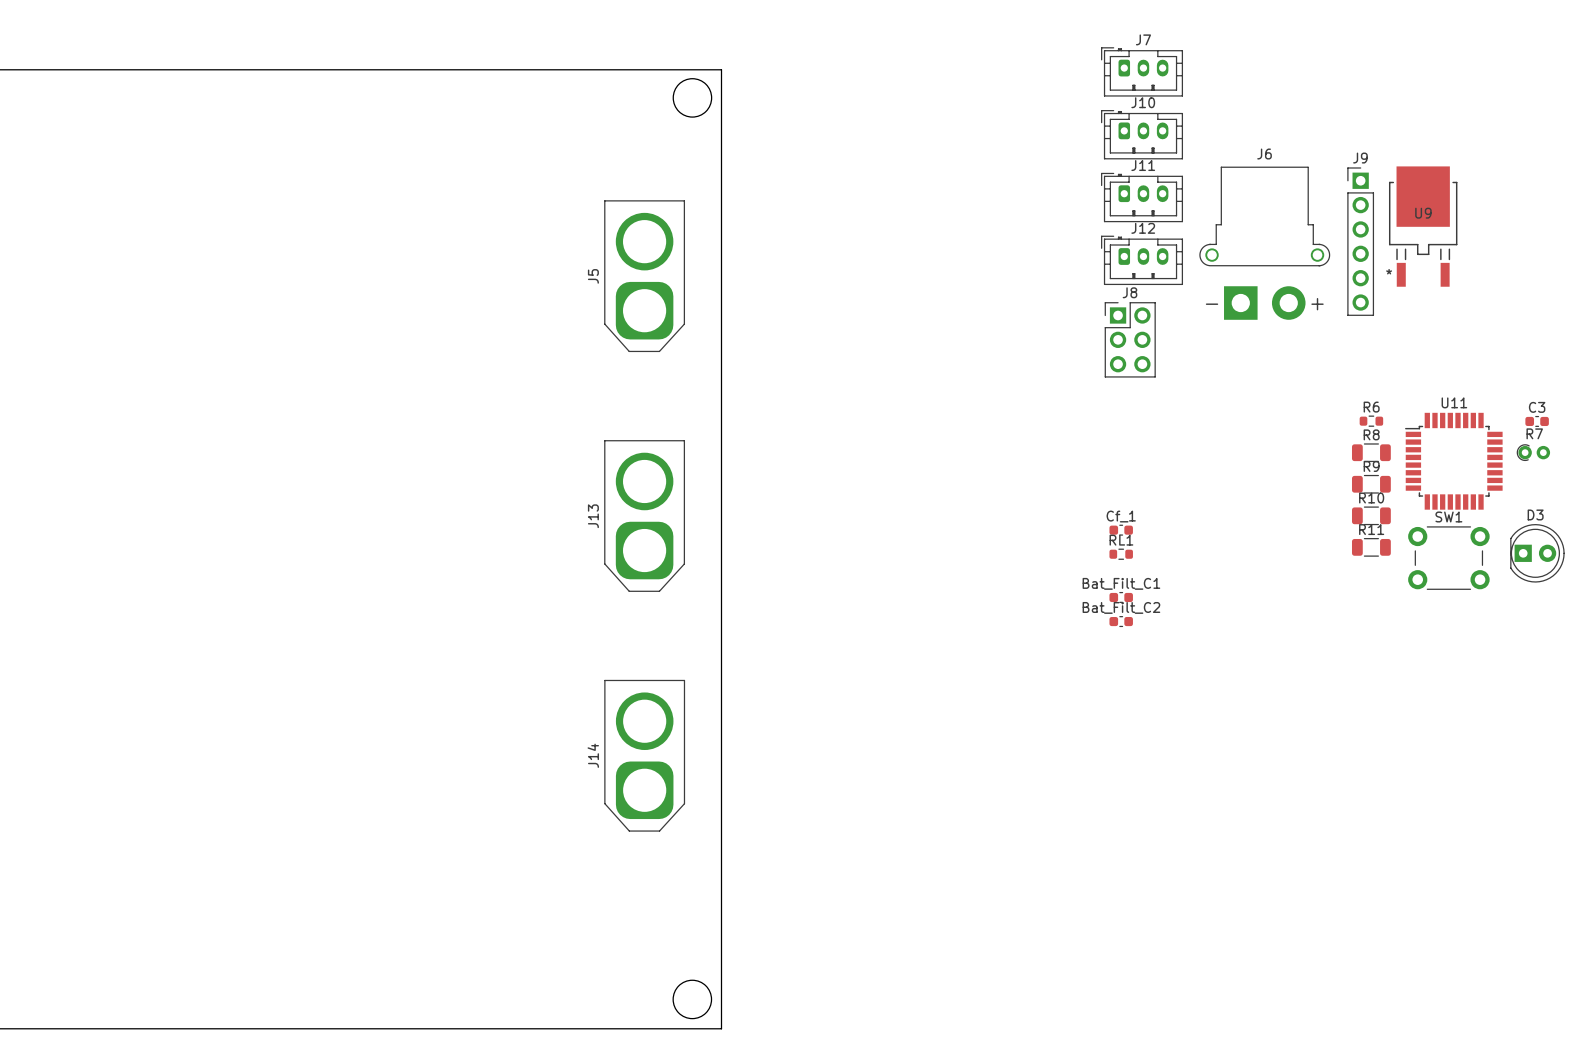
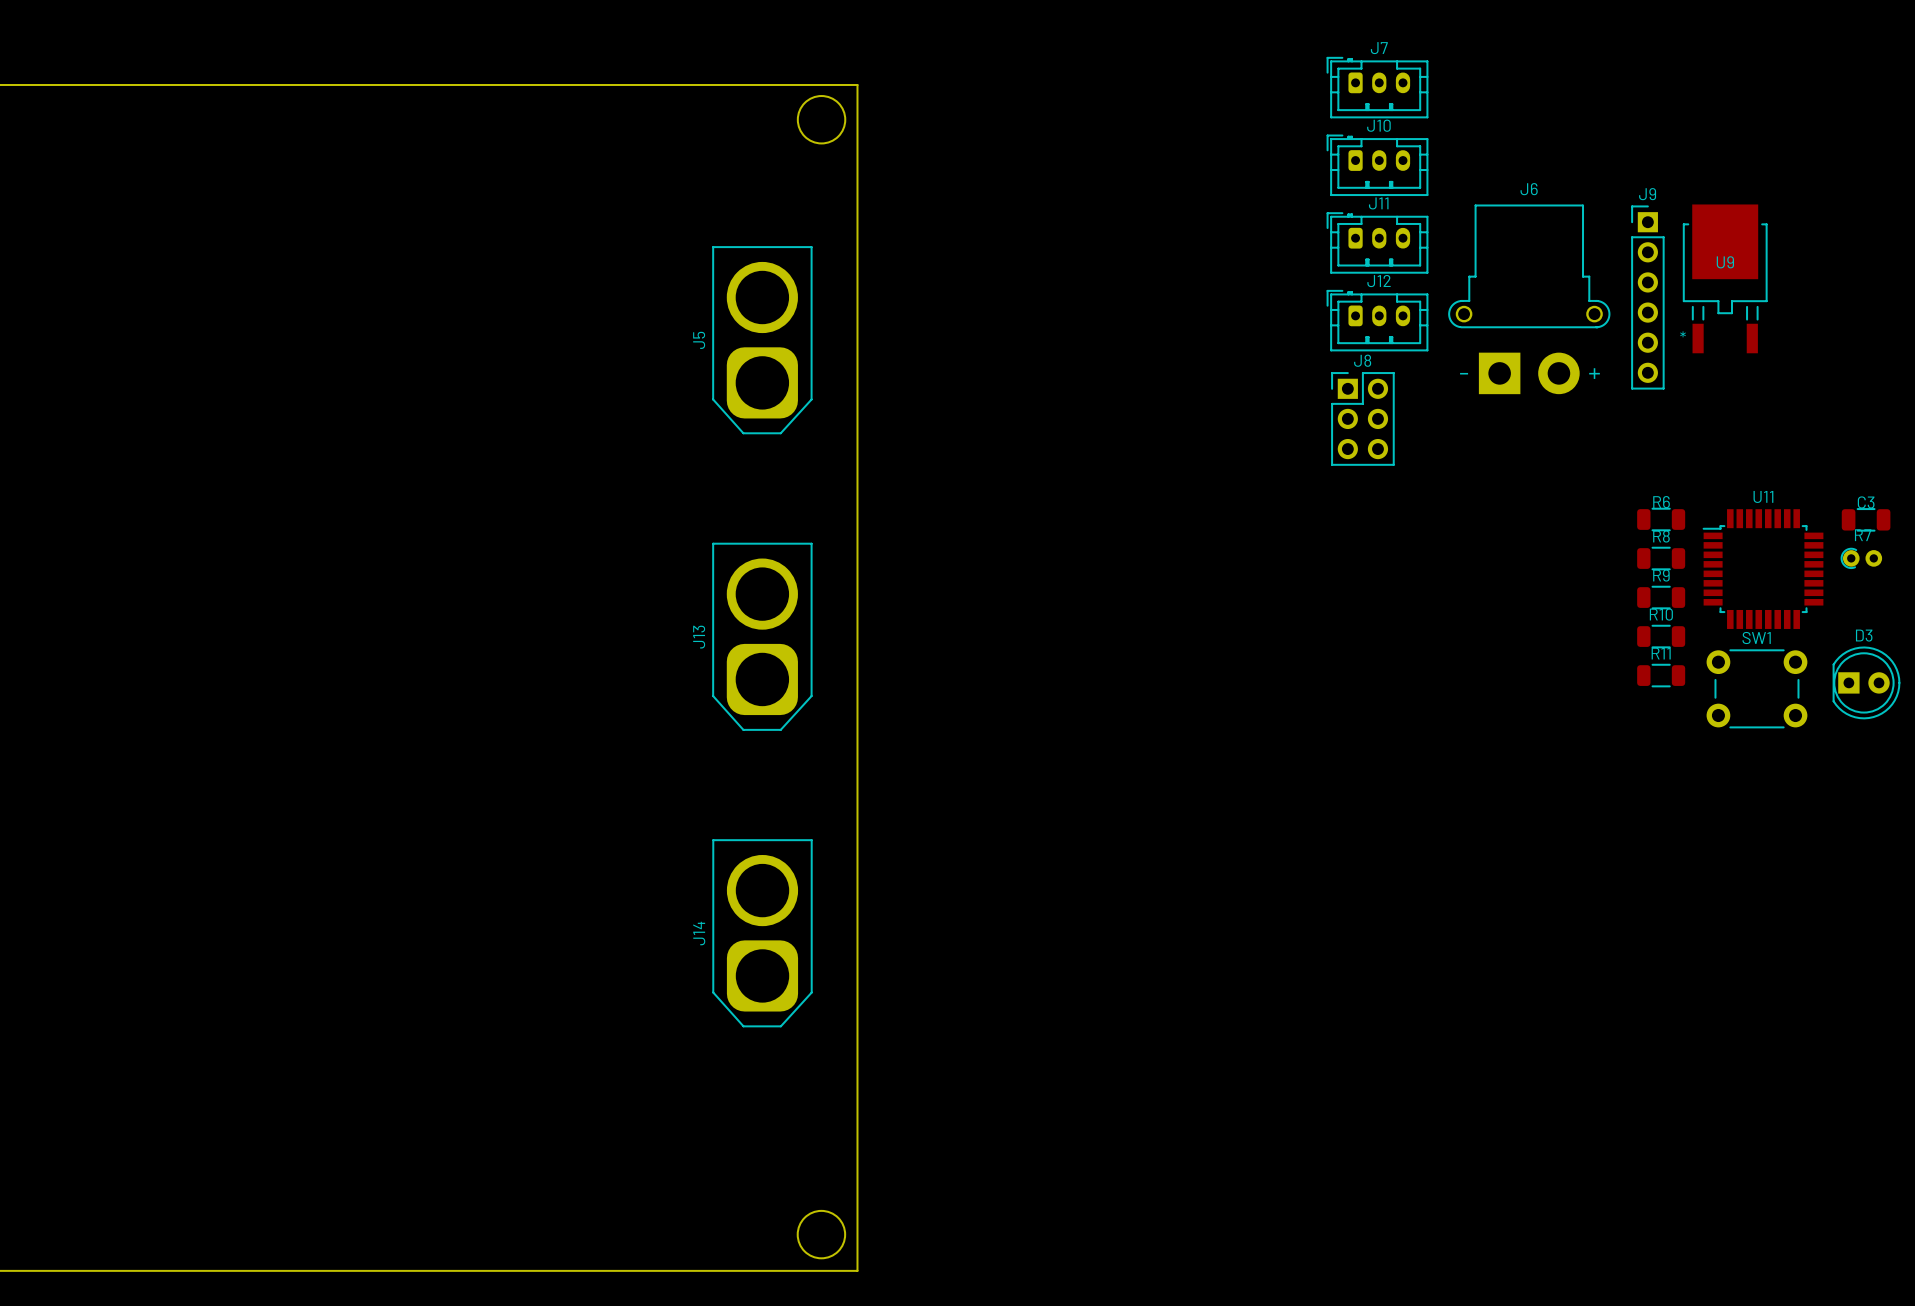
R6 footprint: [1359, 415, 1384, 427] -> [1637, 508, 1686, 532]
C3 footprint: [1525, 415, 1549, 427] -> [1841, 508, 1891, 532]
Cf_1: (1121, 530) -> none
RL1: (1121, 554) -> none
Bat_Filt_C1: (1121, 597) -> none
Bat_Filt_C2: (1121, 621) -> none

